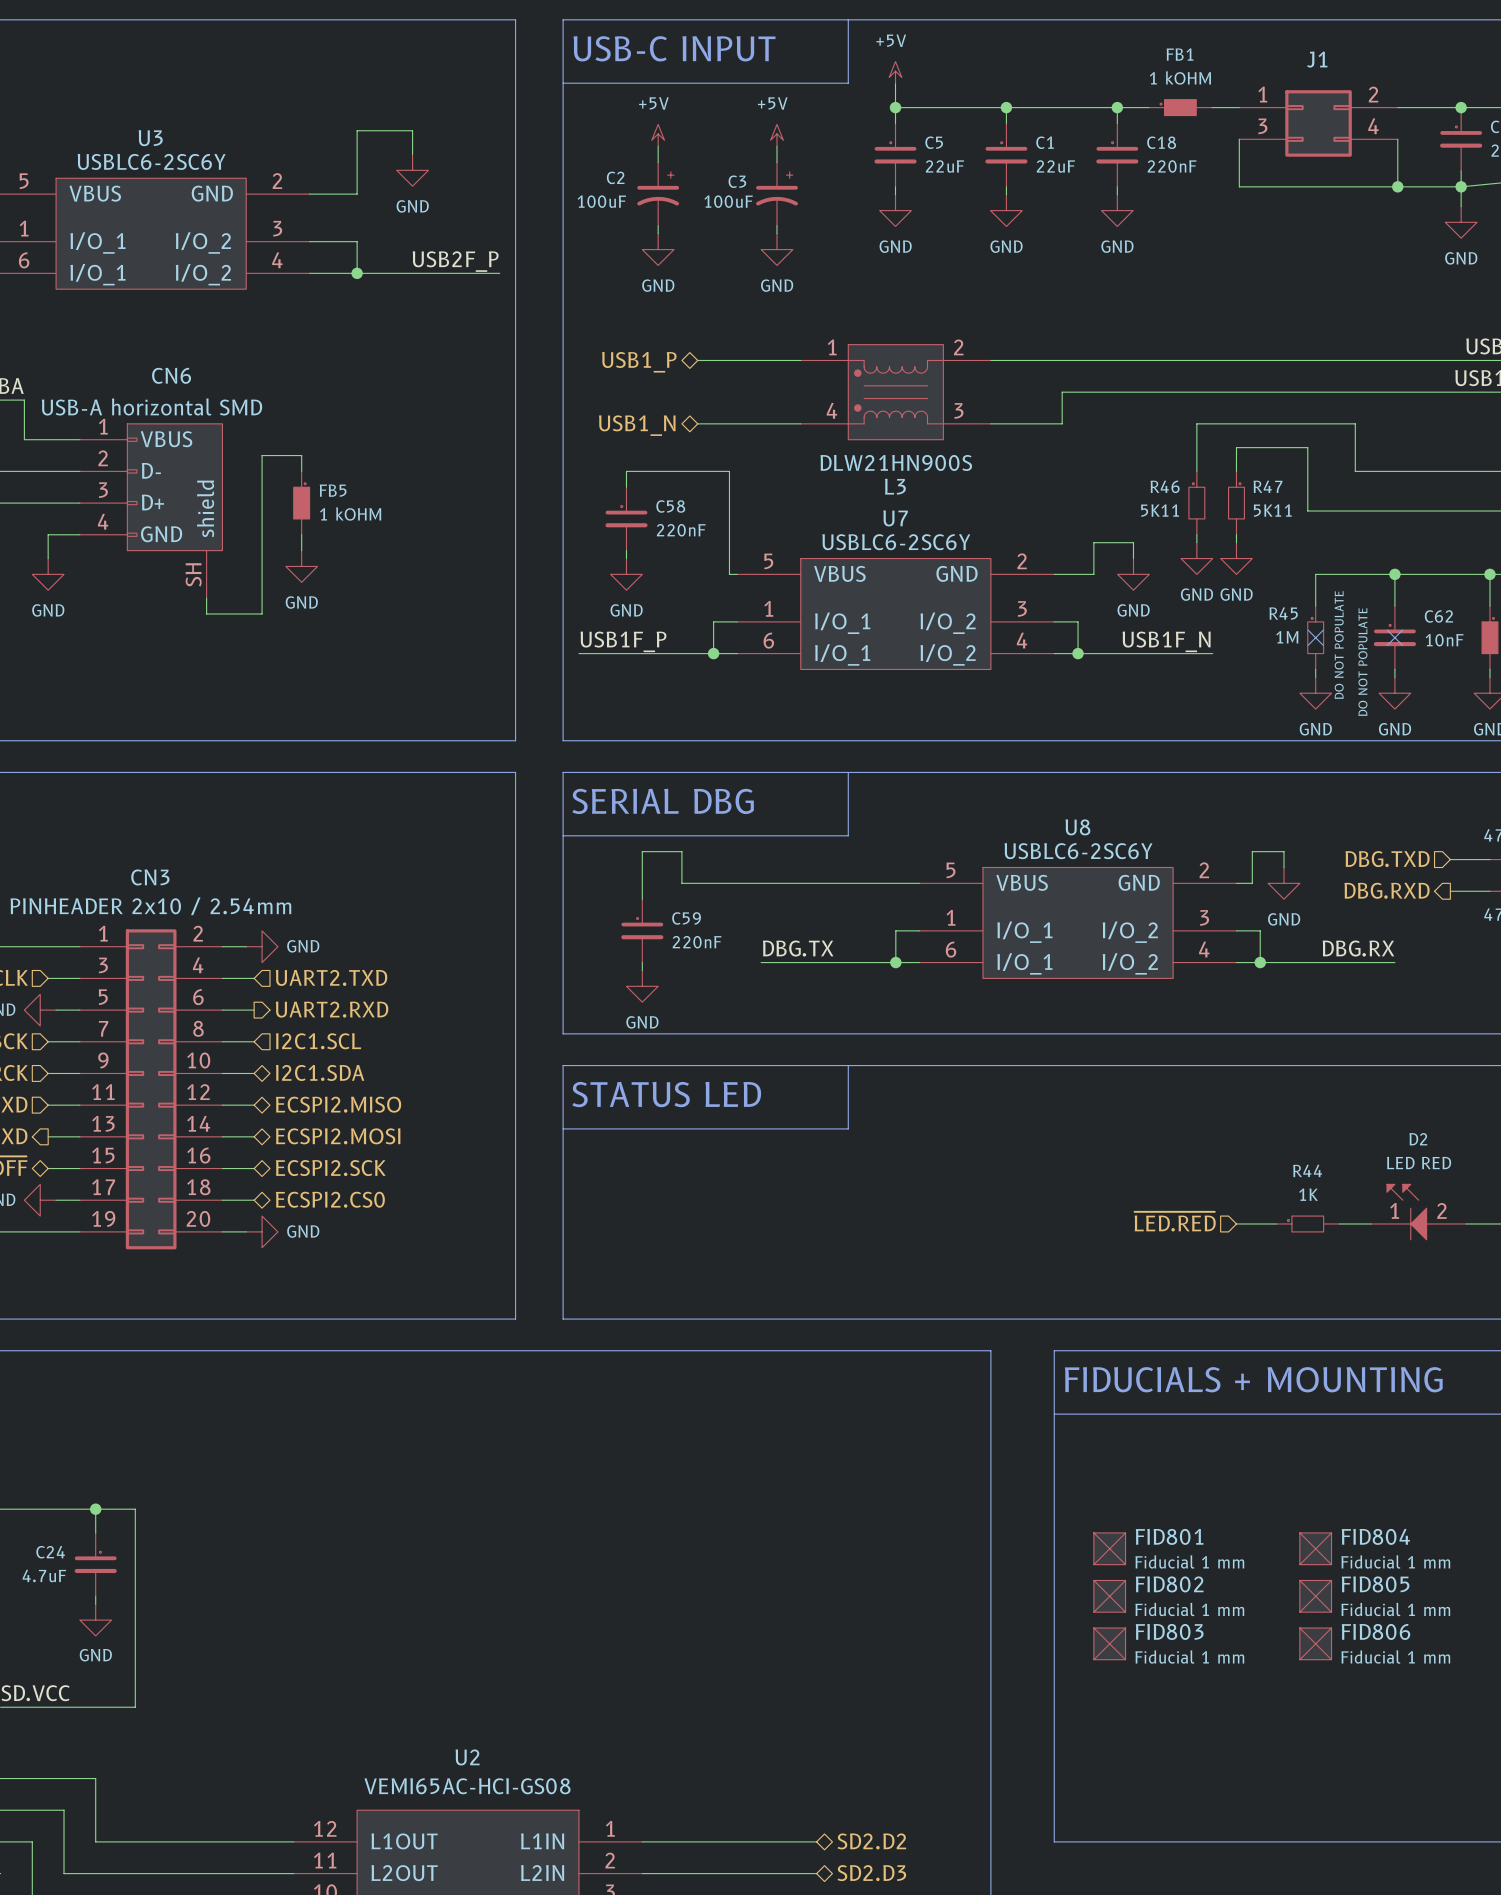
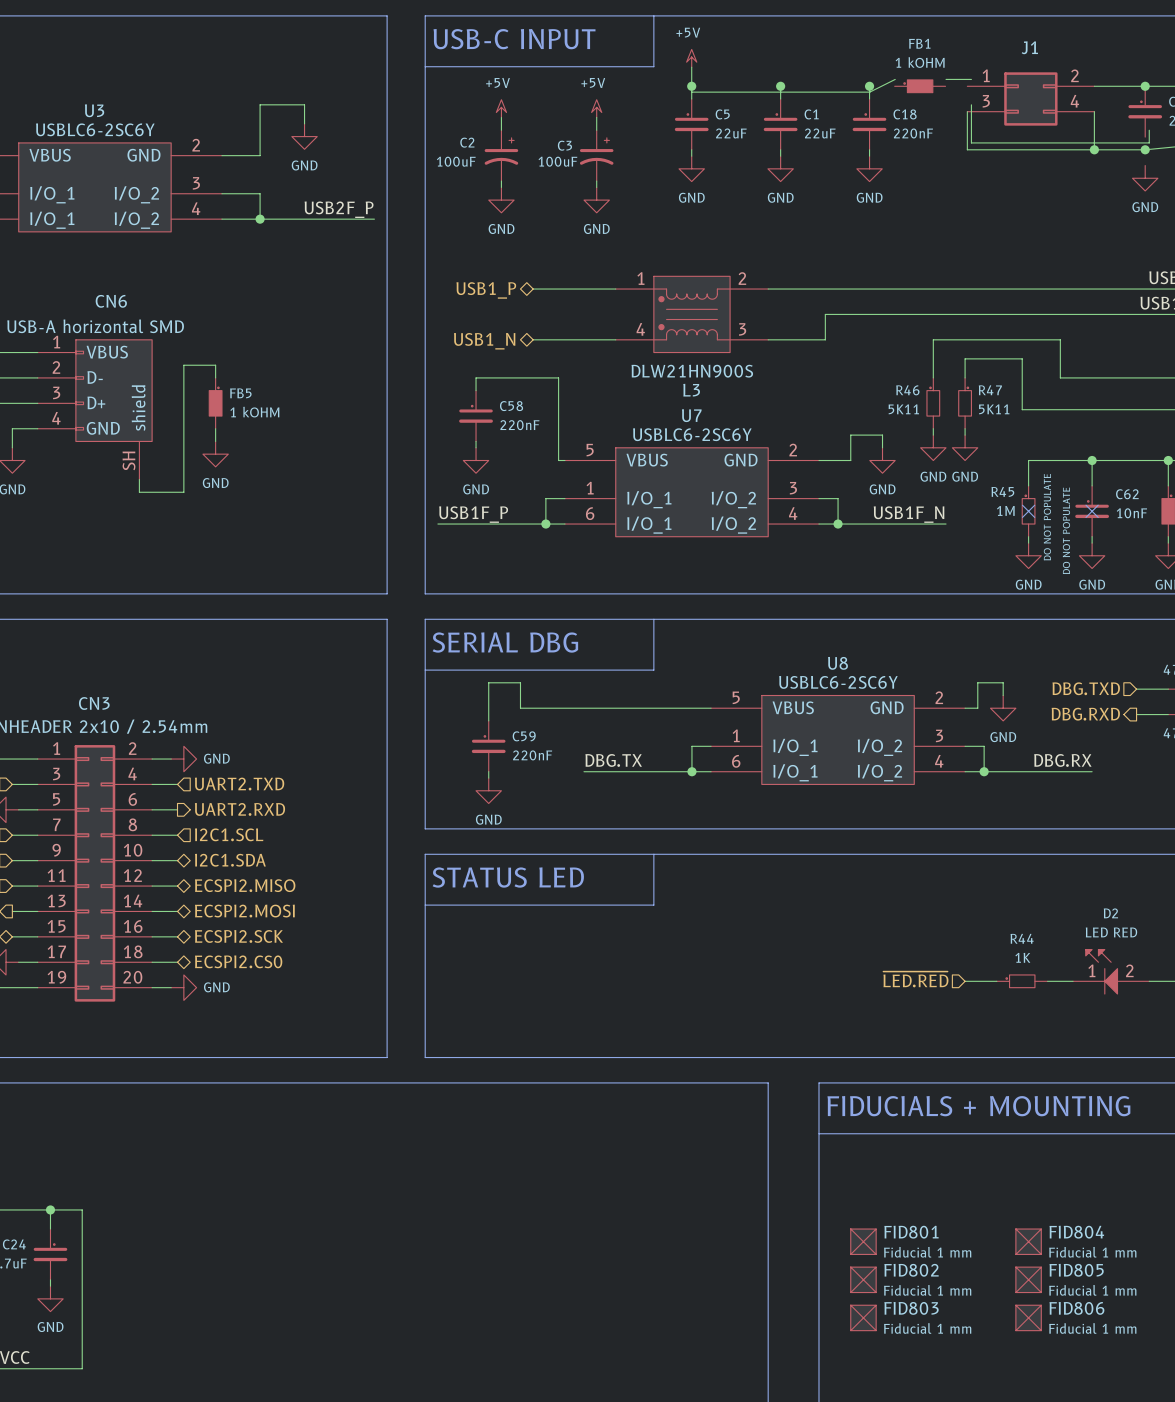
wire: none -> (895, 79) (869, 92) (691, 92)
wire: none -> (946, 79) (971, 79)
wire: (895, 107) (1148, 107) -> none
wire: (1212, 107) (1239, 107) -> none
wire: none -> (971, 104) (971, 142) (1149, 142) (1149, 130)
wire: (1461, 170) (1461, 206) -> none

